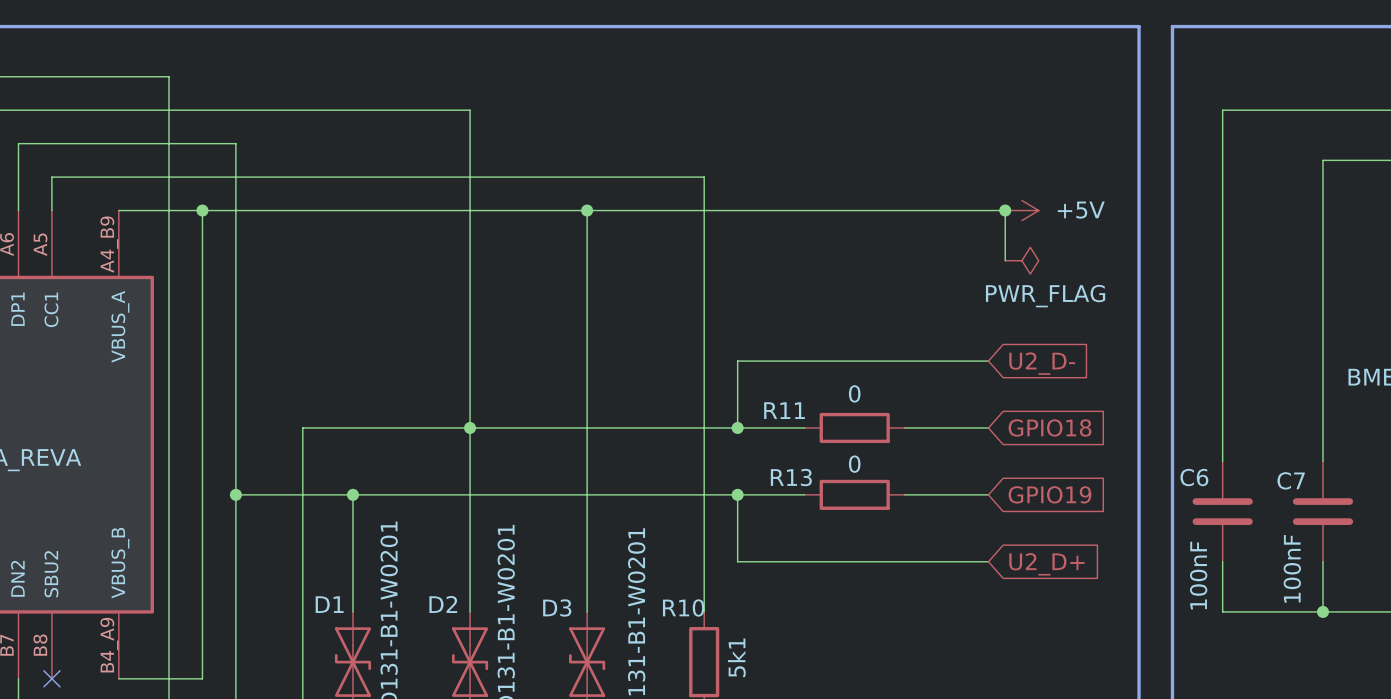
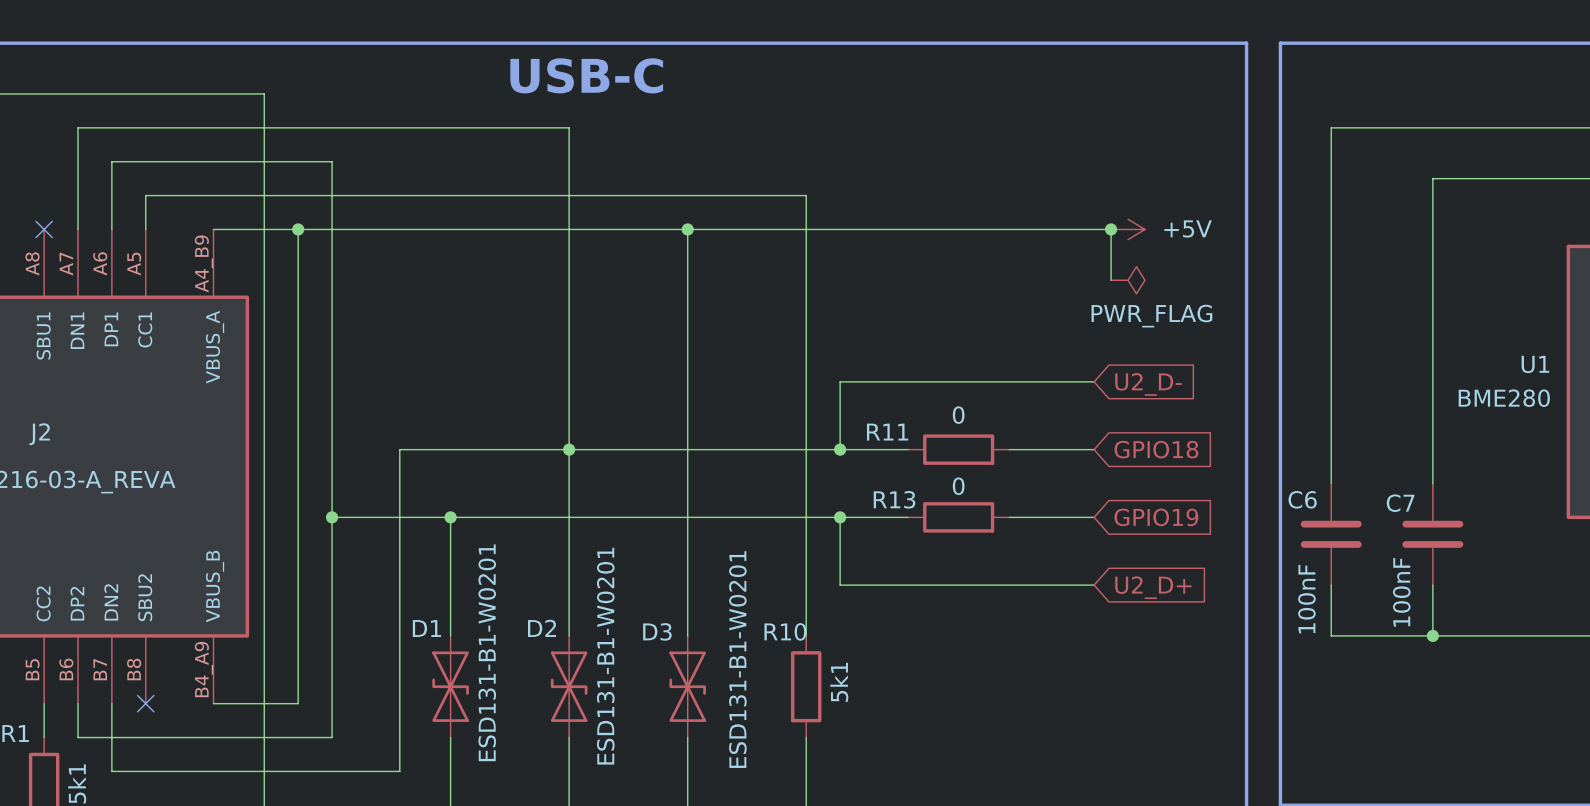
text: none -> USB-C (586, 75)

